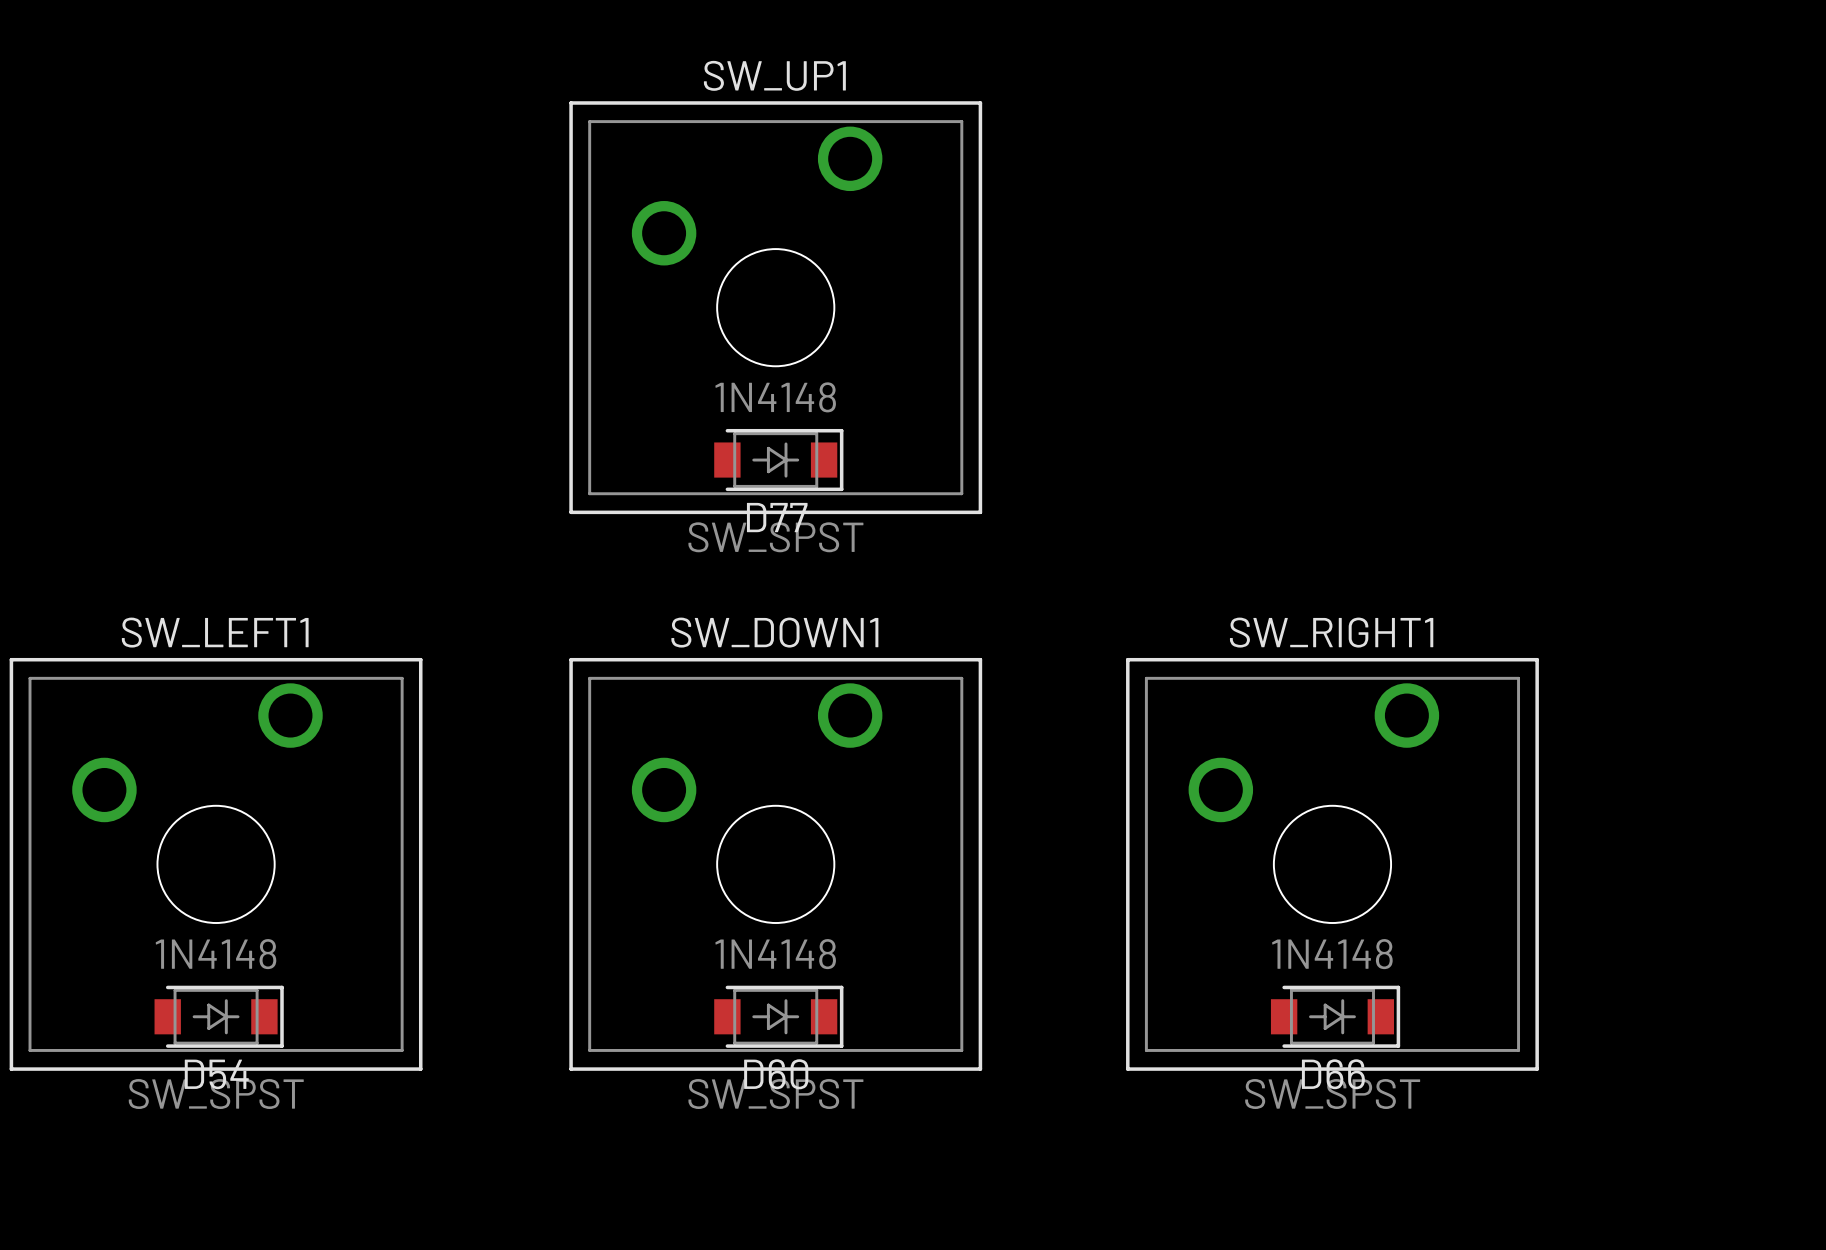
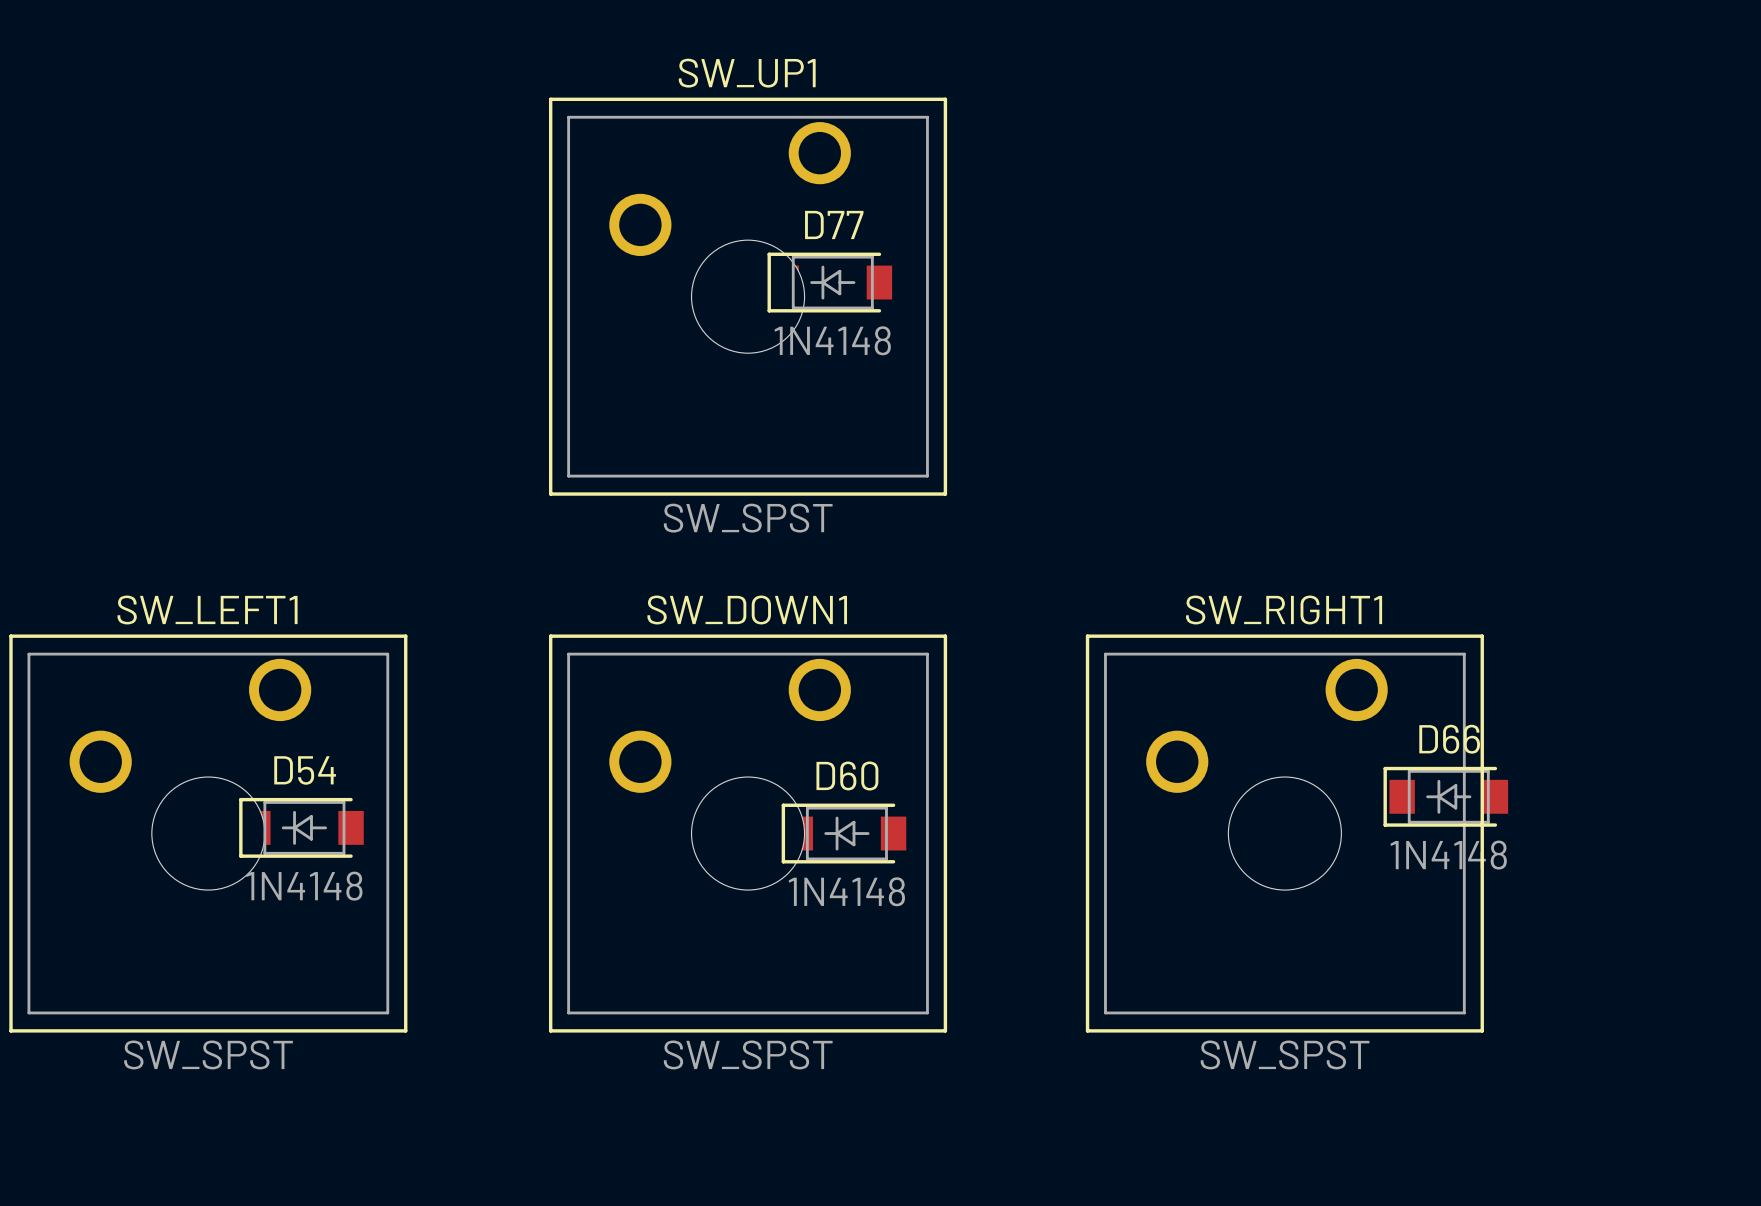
D77 rotation: 0° (778, 460) -> 180° (829, 282)
D77 position: (778, 460) -> (829, 282)
D54 rotation: 0° (219, 1016) -> 180° (301, 827)
D54 position: (219, 1016) -> (301, 827)
D60 rotation: 0° (778, 1016) -> 180° (843, 833)
D60 position: (778, 1016) -> (843, 833)
D66 rotation: 0° (1335, 1016) -> 180° (1445, 796)
D66 position: (1335, 1016) -> (1445, 796)

